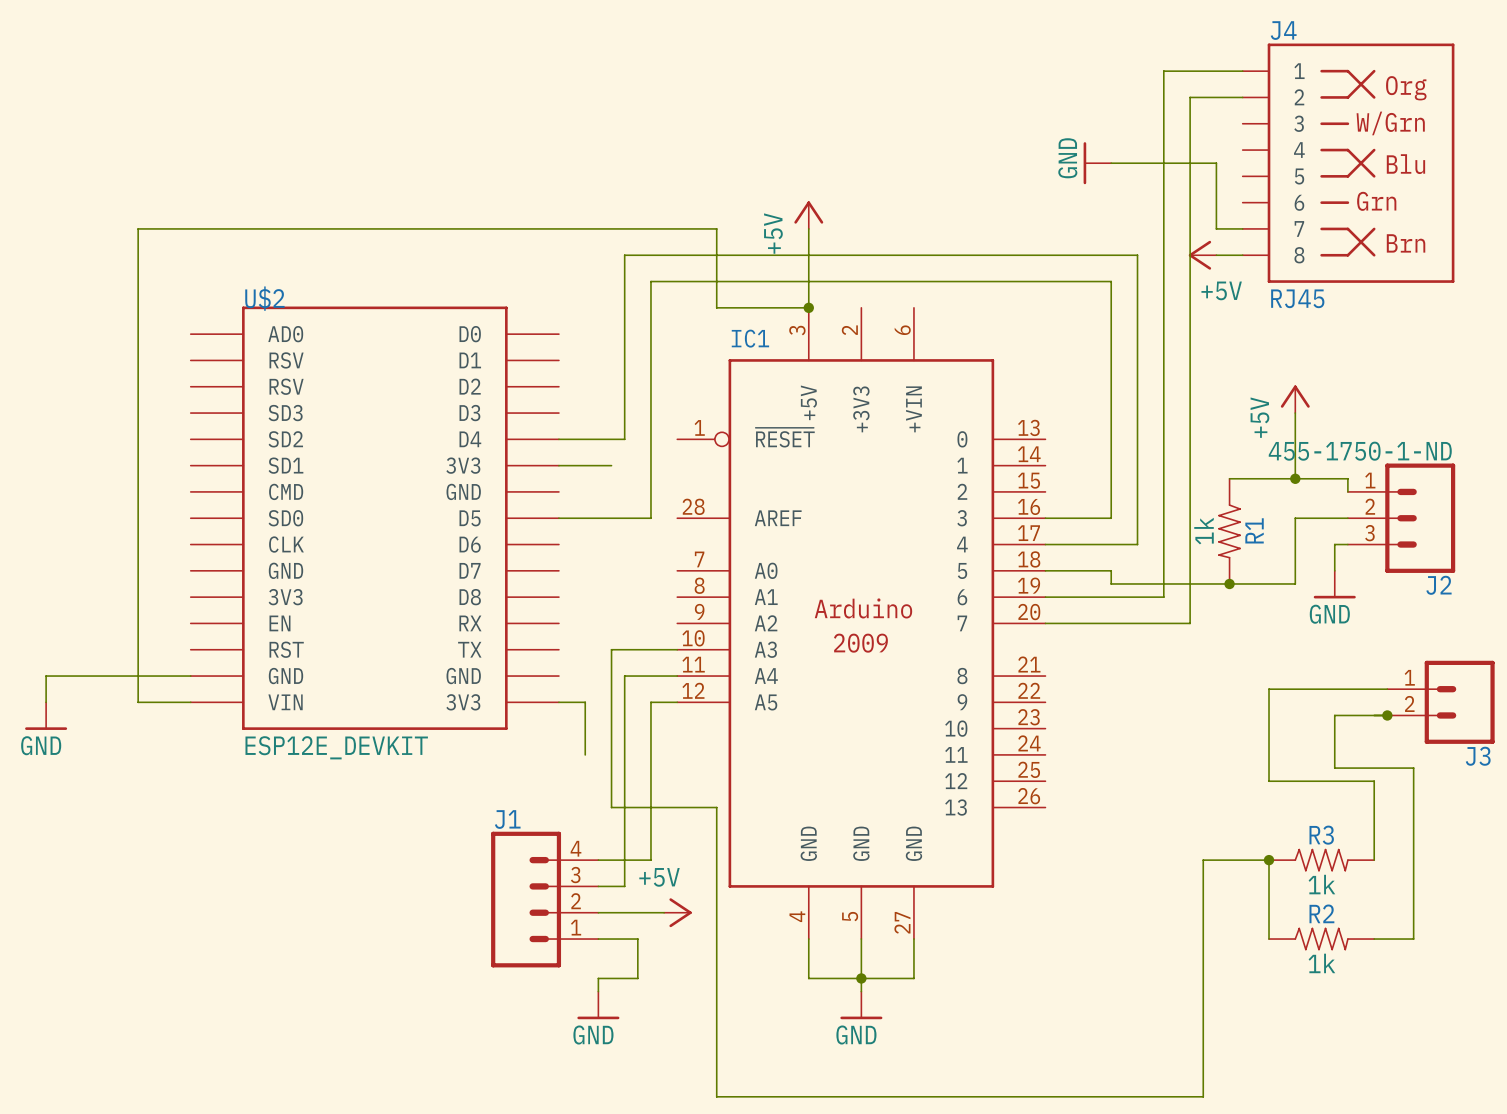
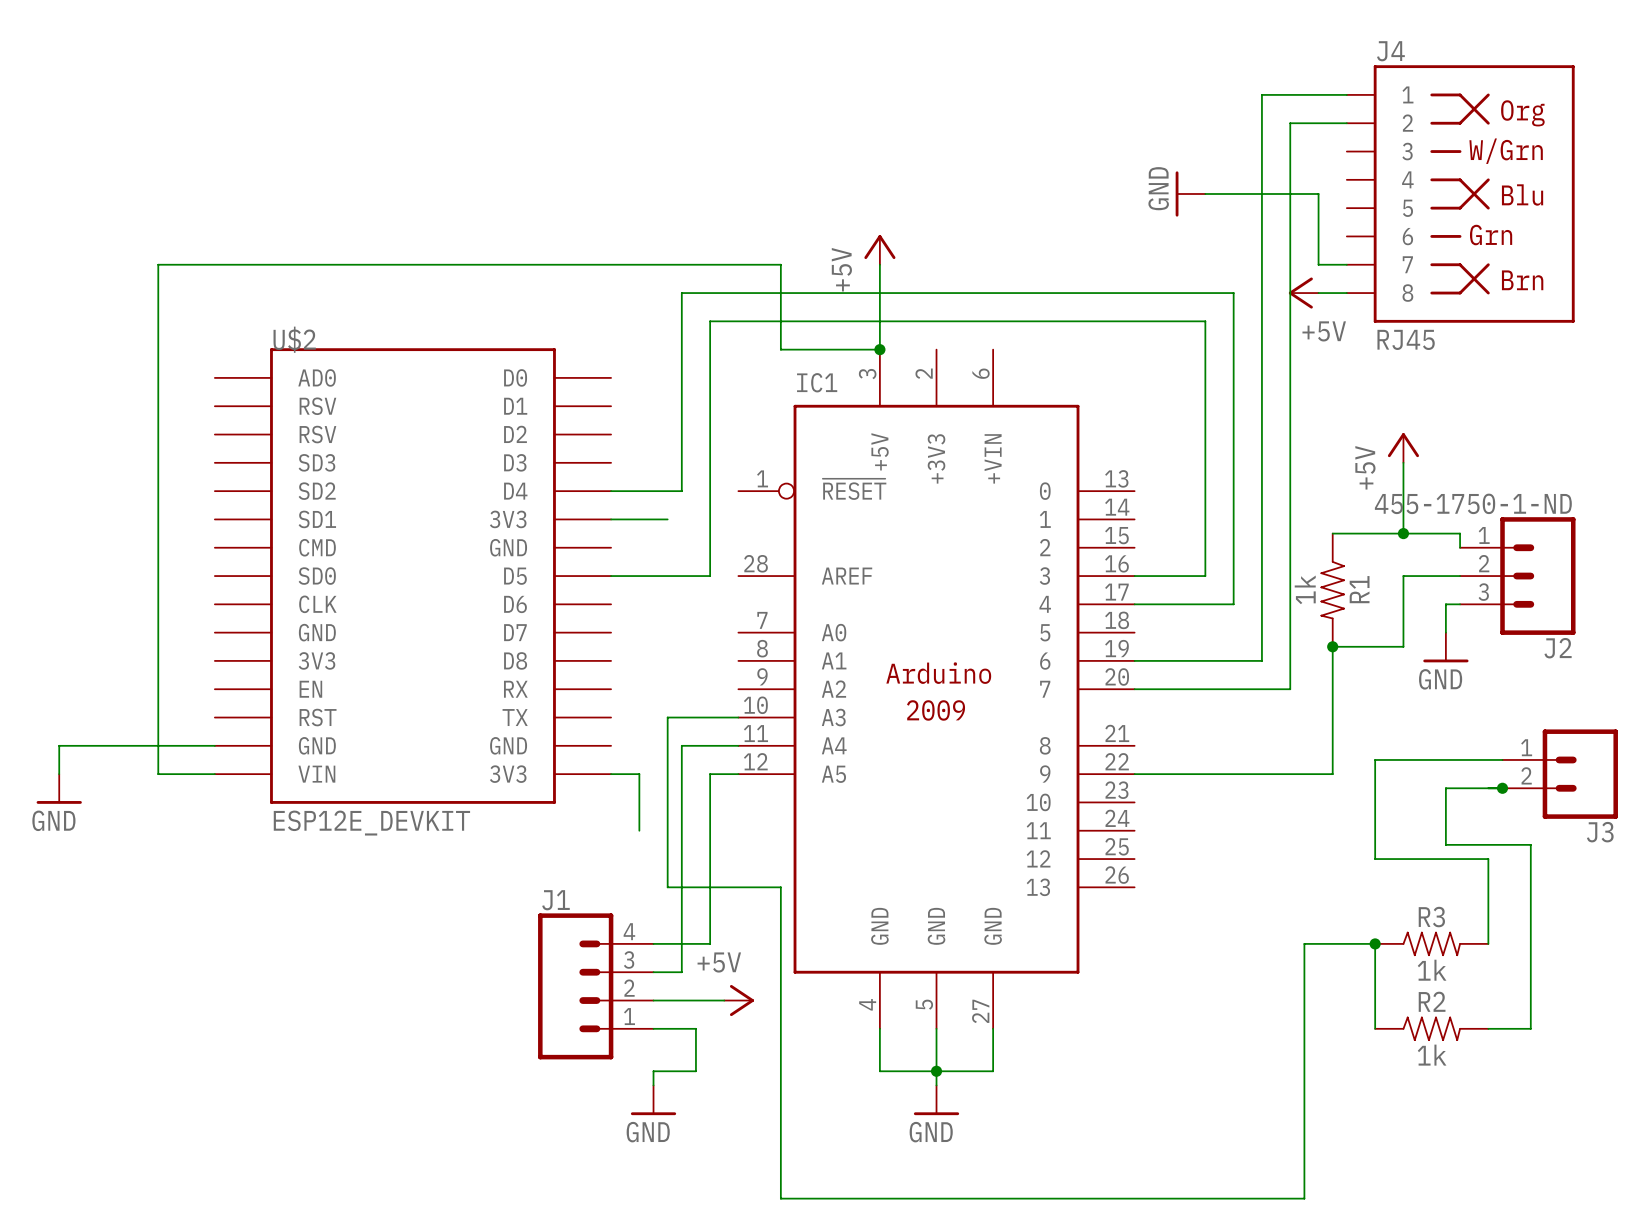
wire: (1045, 570) (1111, 570) (1111, 583) (1229, 583) -> (1134, 774) (1332, 774) (1332, 646)

